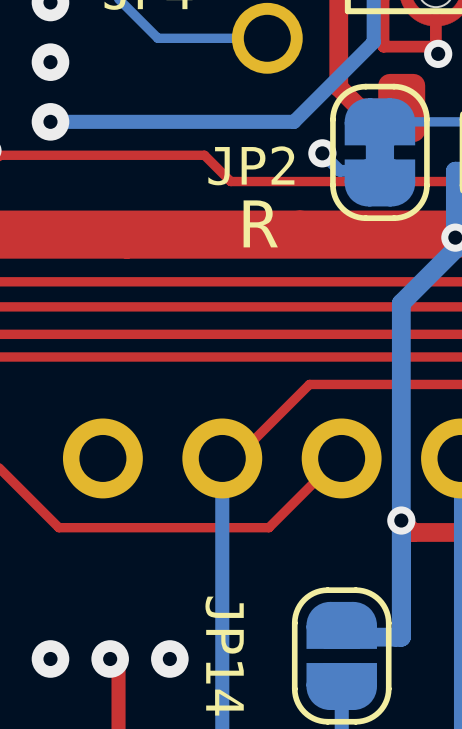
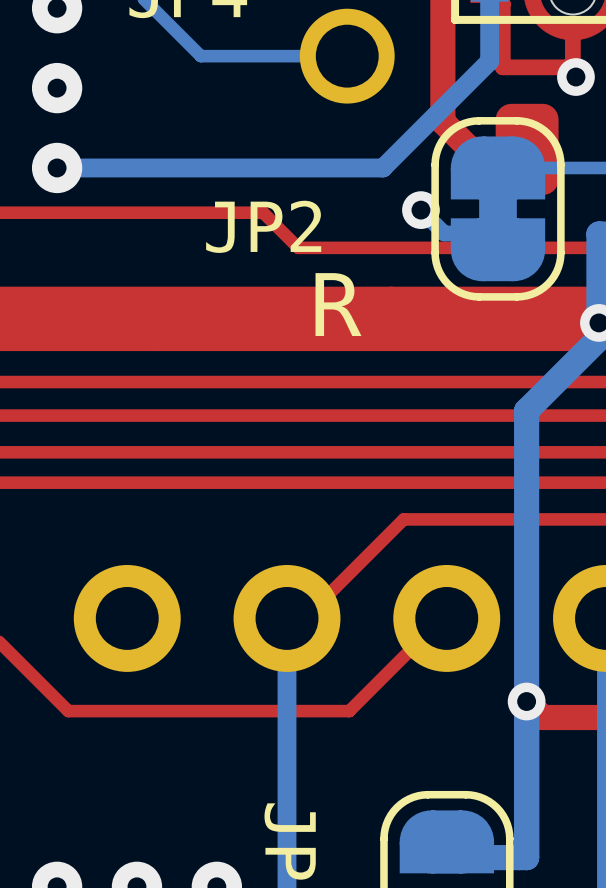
JP2 name position: JP2 (251, 165) -> JP2 (263, 226)

